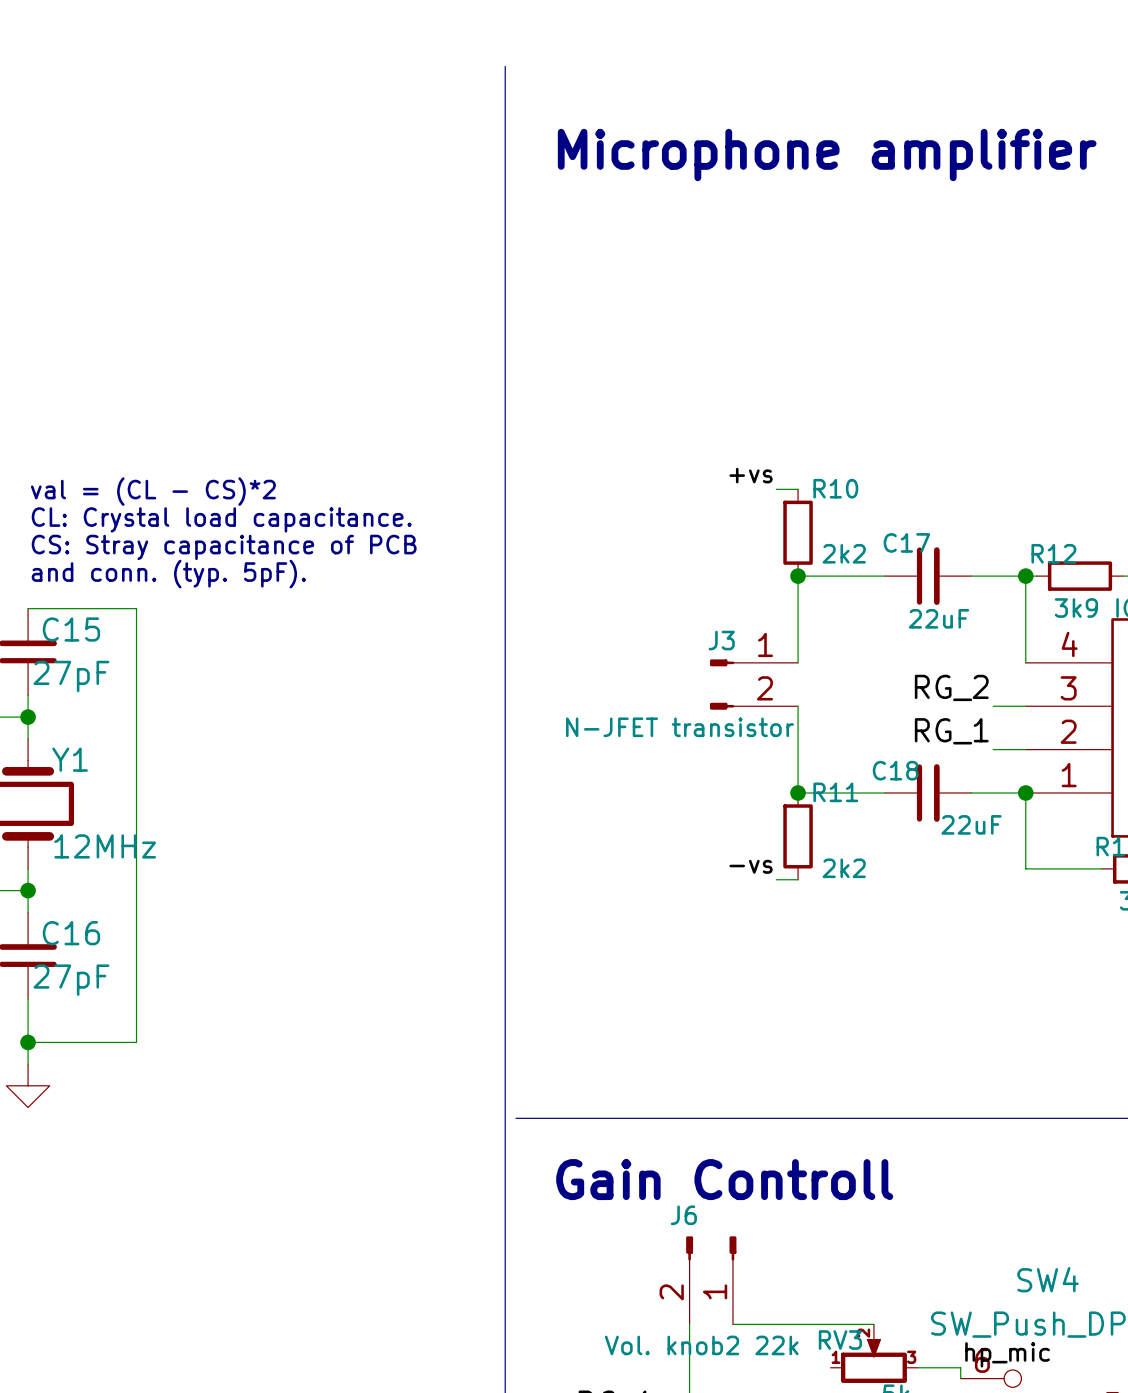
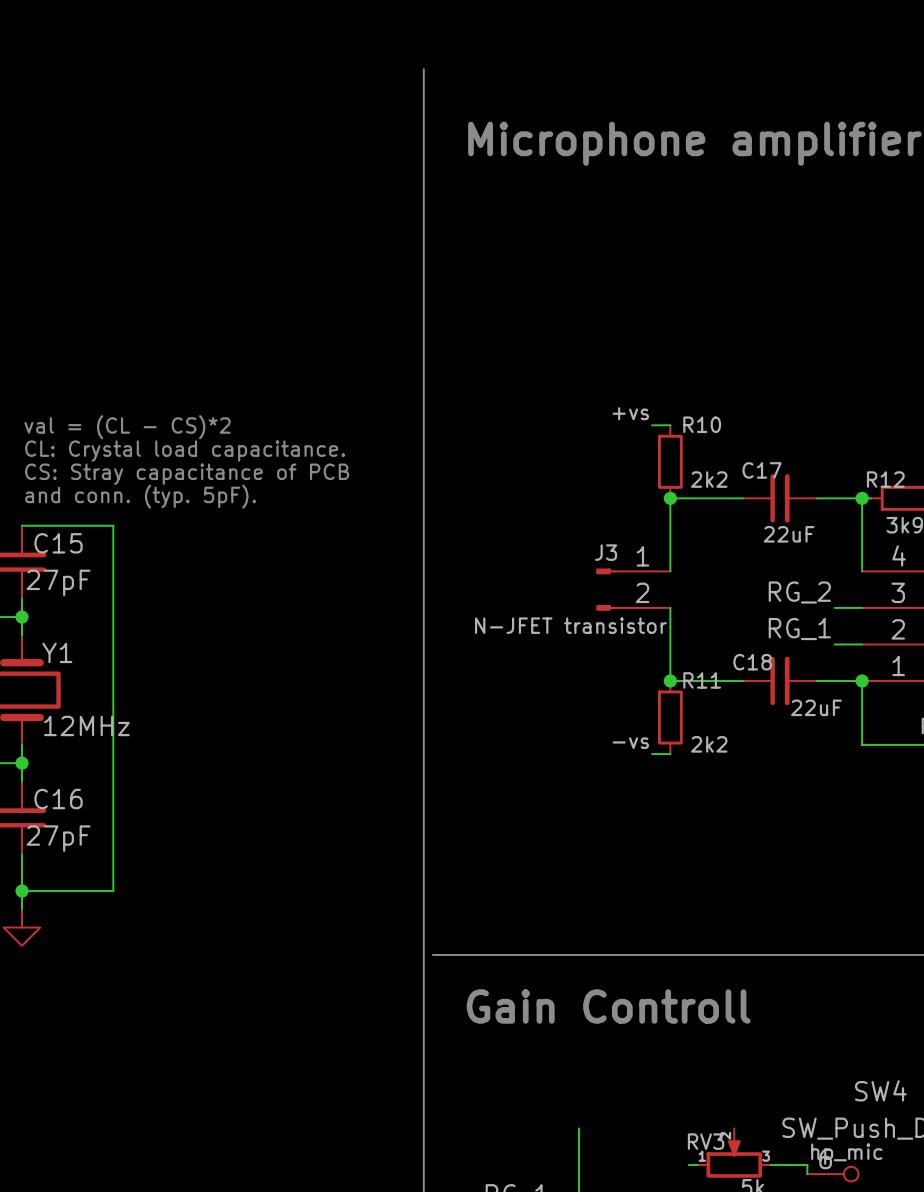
J6: Vol. knob2 22k (711, 1280) -> none
wire: (732, 1324) (873, 1324) -> none
wire: none -> (688, 1164) (697, 1164)

